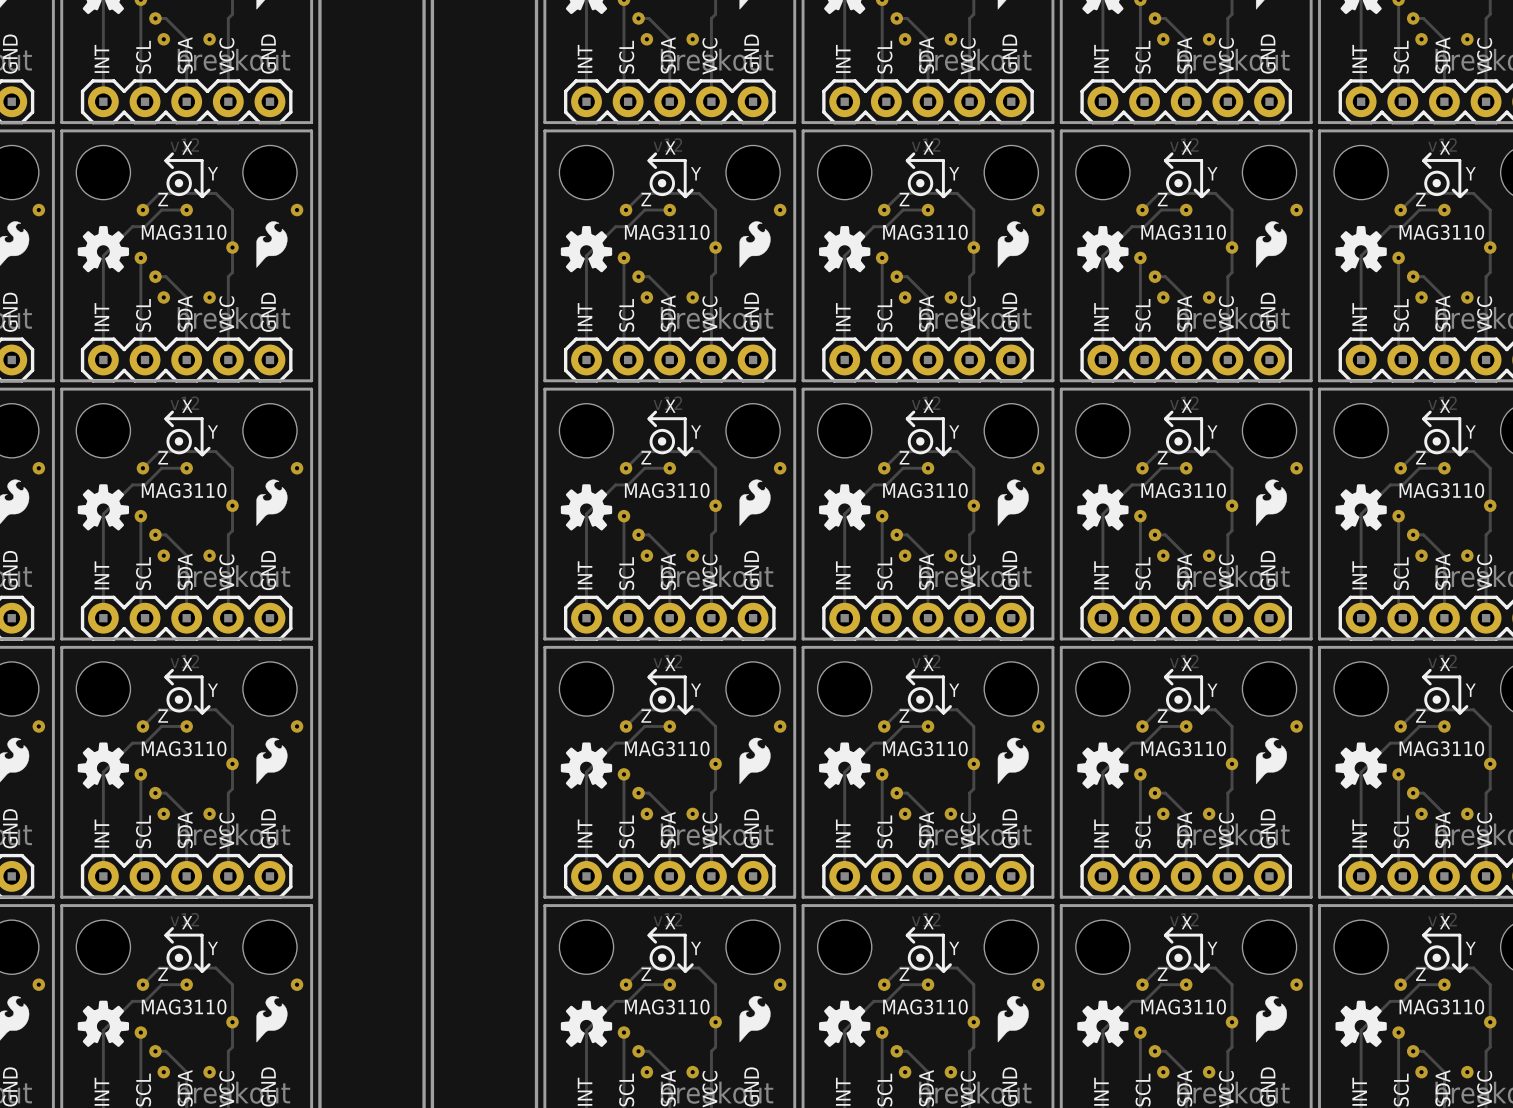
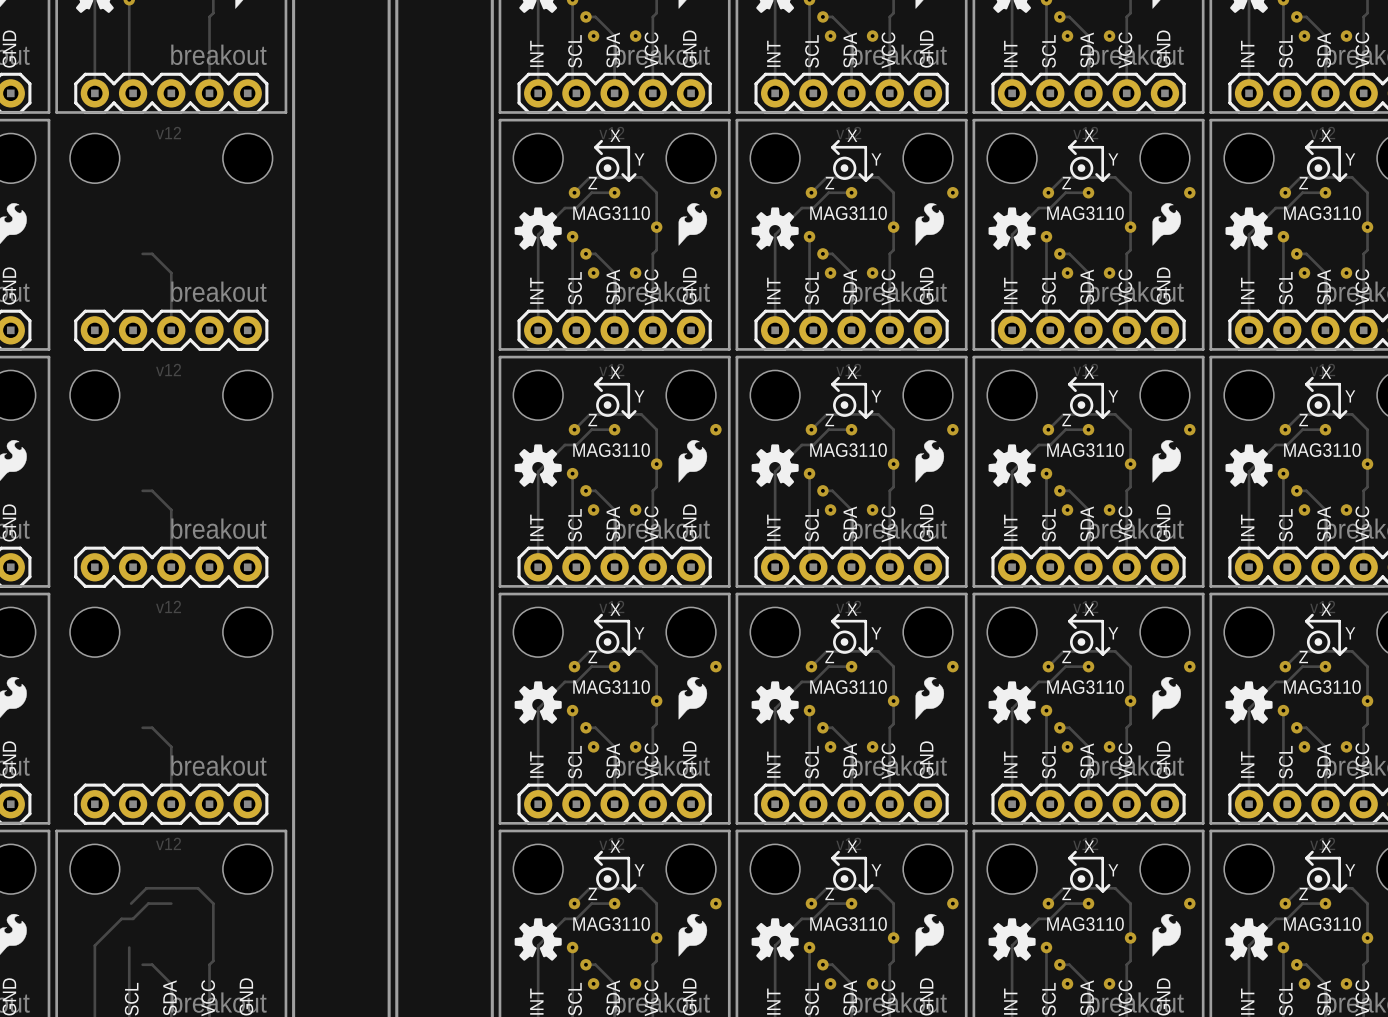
track: (155, 18) (165, 18) (186, 39) (186, 101) -> none
via: (155, 18) -> none
via: (163, 39) -> none
via: (209, 39) -> none
text: GND (268, 54) -> none
text: SDA (185, 55) -> none
text: VCC (226, 56) -> none
text: SCL (143, 57) -> none
text: INT (101, 58) -> none
board edge: (311, 130) (311, 380) (61, 380) (61, 130) (311, 130) -> none
text: X (187, 147) -> none
line: (172, 153) (165, 160) -> none
line: (165, 160) (172, 167) -> none
line: (166, 160) (202, 160) (202, 196) -> none
drawing: [166, 170, 192, 197] -> none
text: Y (212, 173) -> none
line: (195, 190) (202, 196) -> none
line: (209, 190) (202, 196) -> none
text: Z (163, 199) -> none
via: (38, 210) -> none
track: (142, 210) (159, 193) (215, 193) (232, 210) (232, 272) (228, 276) (228, 359) -> none
via: (142, 210) -> none
track: (186, 210) (161, 210) (145, 226) (132, 226) (103, 255) (103, 359) -> none
via: (186, 210) -> none
via: (297, 210) -> none
drawing: [256, 221, 288, 268] -> none
drawing: [77, 226, 130, 273] -> none
text: MAG3110 (184, 232) -> none
via: (232, 247) -> none
track: (140, 257) (140, 355) (145, 359) -> none
via: (140, 257) -> none
via: (155, 276) -> none
via: (163, 297) -> none
via: (209, 297) -> none
text: GND (268, 312) -> none
text: SDA (185, 313) -> none
text: VCC (226, 314) -> none
text: SCL (143, 315) -> none
text: INT (101, 317) -> none
board edge: (311, 389) (311, 639) (61, 639) (61, 389) (311, 389) -> none
text: X (187, 406) -> none
line: (172, 412) (165, 418) -> none
line: (166, 418) (202, 418) (202, 454) -> none
line: (165, 419) (172, 425) -> none
drawing: [166, 428, 192, 455] -> none
text: Y (212, 432) -> none
line: (195, 448) (202, 454) -> none
line: (209, 448) (202, 454) -> none
text: Z (163, 457) -> none
via: (38, 468) -> none
track: (142, 468) (159, 451) (215, 451) (232, 468) (232, 530) (228, 534) (228, 618) -> none
via: (142, 468) -> none
track: (186, 468) (161, 468) (145, 484) (132, 484) (103, 514) (103, 618) -> none
via: (186, 468) -> none
via: (297, 468) -> none
drawing: [256, 479, 288, 526] -> none
drawing: [77, 484, 130, 531] -> none
text: MAG3110 (184, 490) -> none
via: (232, 505) -> none
track: (140, 516) (140, 614) (145, 618) -> none
via: (140, 516) -> none
via: (155, 534) -> none
via: (163, 555) -> none
via: (209, 555) -> none
text: GND (268, 570) -> none
text: SDA (185, 571) -> none
text: VCC (226, 572) -> none
text: SCL (143, 573) -> none
text: INT (101, 575) -> none
board edge: (311, 647) (311, 897) (61, 897) (61, 647) (311, 647) -> none
text: X (187, 664) -> none
line: (172, 670) (165, 676) -> none
line: (166, 676) (202, 676) (202, 712) -> none
line: (165, 677) (172, 683) -> none
drawing: [166, 687, 192, 713] -> none
text: Y (212, 690) -> none
line: (195, 706) (202, 713) -> none
line: (209, 706) (202, 713) -> none
text: Z (163, 716) -> none
via: (38, 726) -> none
track: (142, 726) (159, 709) (215, 709) (232, 726) (232, 788) (228, 793) (228, 876) -> none
via: (142, 726) -> none
track: (186, 726) (161, 726) (145, 743) (132, 743) (103, 772) (103, 876) -> none
via: (186, 726) -> none
via: (297, 726) -> none
drawing: [256, 737, 288, 785] -> none
drawing: [77, 742, 130, 789] -> none
text: MAG3110 (184, 748) -> none
via: (232, 763) -> none
track: (140, 774) (140, 872) (145, 876) -> none
via: (140, 774) -> none
via: (155, 793) -> none
via: (163, 813) -> none
via: (209, 813) -> none
text: GND (268, 828) -> none
text: SDA (185, 830) -> none
text: SCL (143, 831) -> none
text: VCC (226, 831) -> none
text: INT (101, 833) -> none
text: X (187, 922) -> none
line: (172, 928) (165, 935) -> none
line: (165, 935) (172, 942) -> none
line: (166, 935) (202, 935) (202, 970) -> none
drawing: [166, 945, 192, 971] -> none
text: Y (212, 948) -> none
line: (195, 964) (202, 971) -> none
line: (209, 964) (202, 971) -> none
text: Z (163, 974) -> none
via: (38, 984) -> none
via: (142, 984) -> none
via: (186, 984) -> none
via: (297, 984) -> none
drawing: [256, 995, 288, 1043] -> none
drawing: [77, 1000, 130, 1047] -> none
text: MAG3110 (184, 1006) -> none
via: (232, 1022) -> none
via: (140, 1032) -> none
via: (155, 1051) -> none
via: (163, 1072) -> none
via: (209, 1072) -> none
text: INT (101, 1091) -> none

